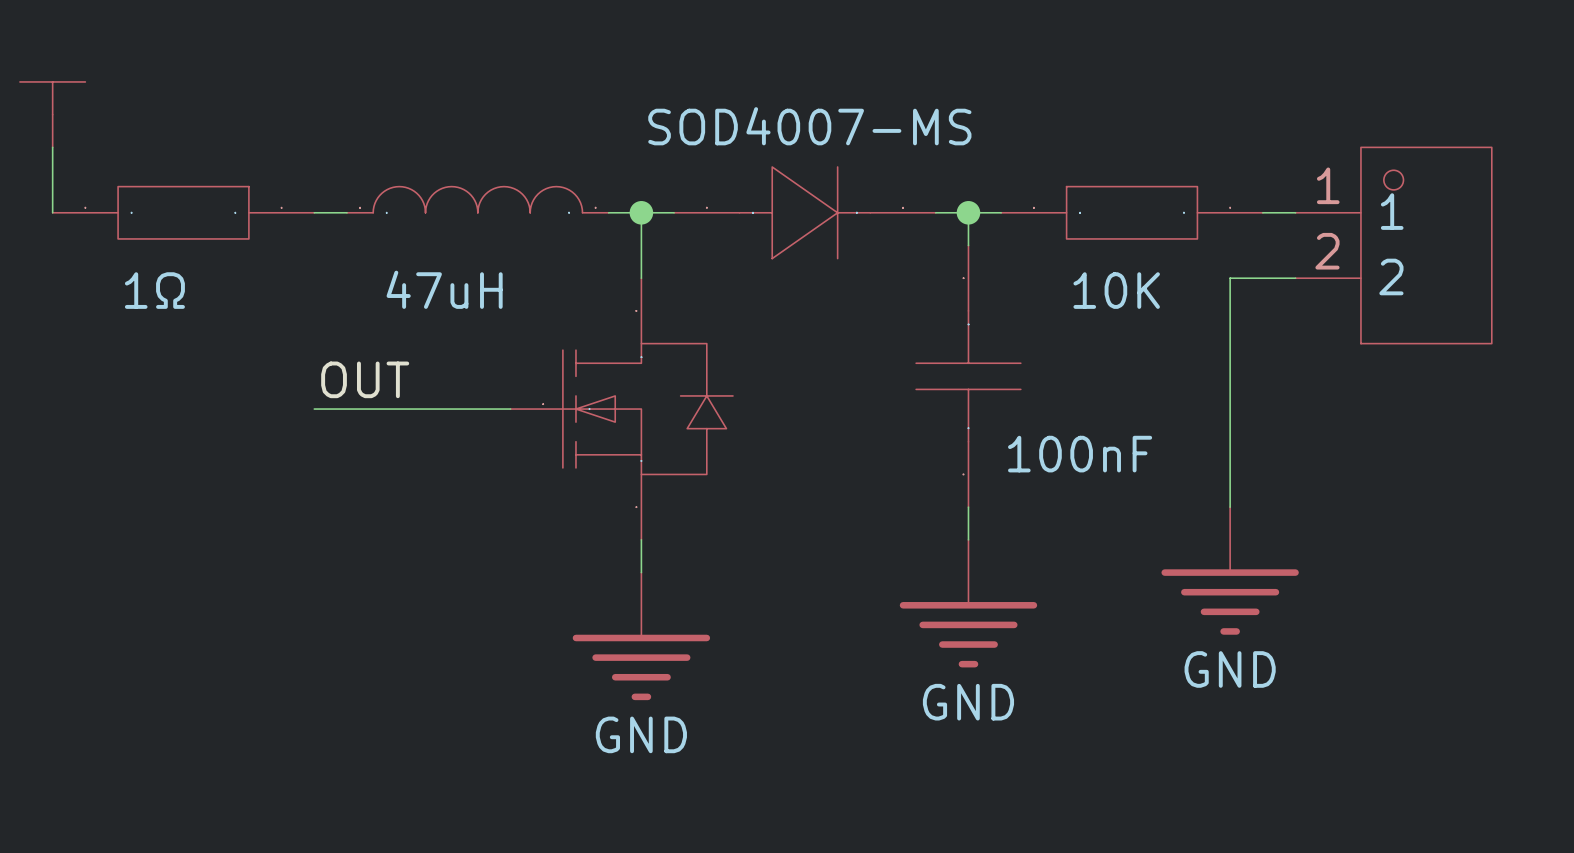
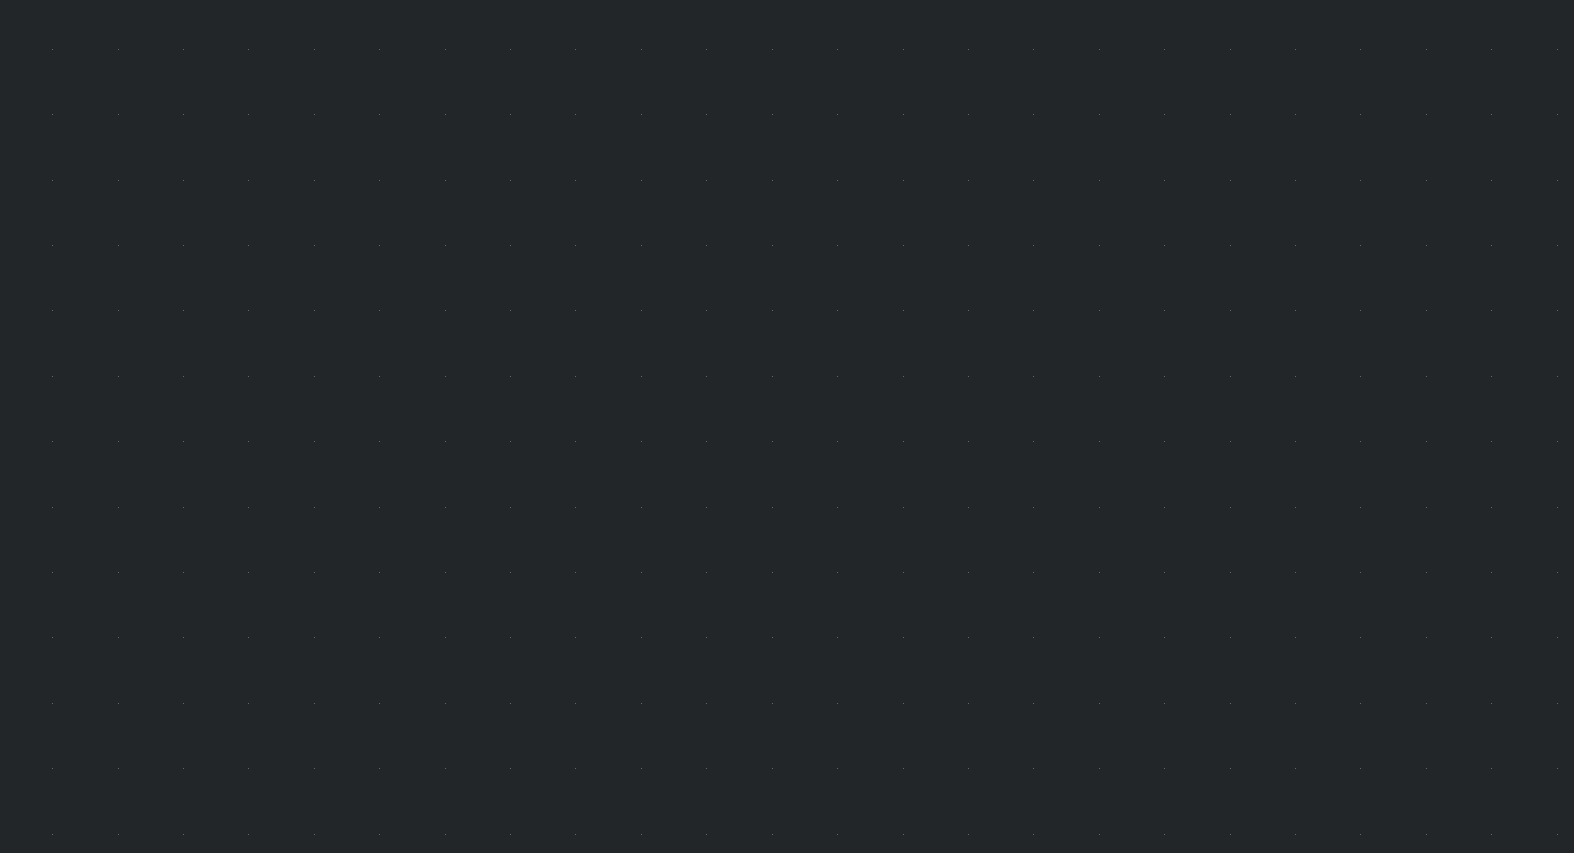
power symbol: (52, 114) -> none
wire: (52, 147) (52, 212) -> none
part: 47uH (477, 199) -> none
part: 1Ω (183, 212) -> none
wire: (314, 212) (347, 212) -> none
wire: (608, 212) (674, 212) -> none
wire: (641, 212) (641, 278) -> none
junction: (641, 212) -> none
part: SOD4007-MS (804, 212) -> none
wire: (935, 212) (1001, 212) -> none
wire: (968, 212) (968, 245) -> none
junction: (968, 212) -> none
part: 10K (1132, 212) -> none
wire: (1262, 212) (1295, 212) -> none
part: (1393, 245) -> none
wire: (1295, 278) (1230, 278) (1230, 507) -> none
part: 100nF (968, 376) -> none
label: OUT (365, 379) -> none
wire: (314, 409) (510, 409) -> none
part: (621, 409) -> none
wire: (968, 507) (968, 539) -> none
wire: (641, 539) (641, 572) -> none
power symbol: GND (1230, 570) -> none
power symbol: GND (968, 603) -> none
power symbol: GND (641, 636) -> none

